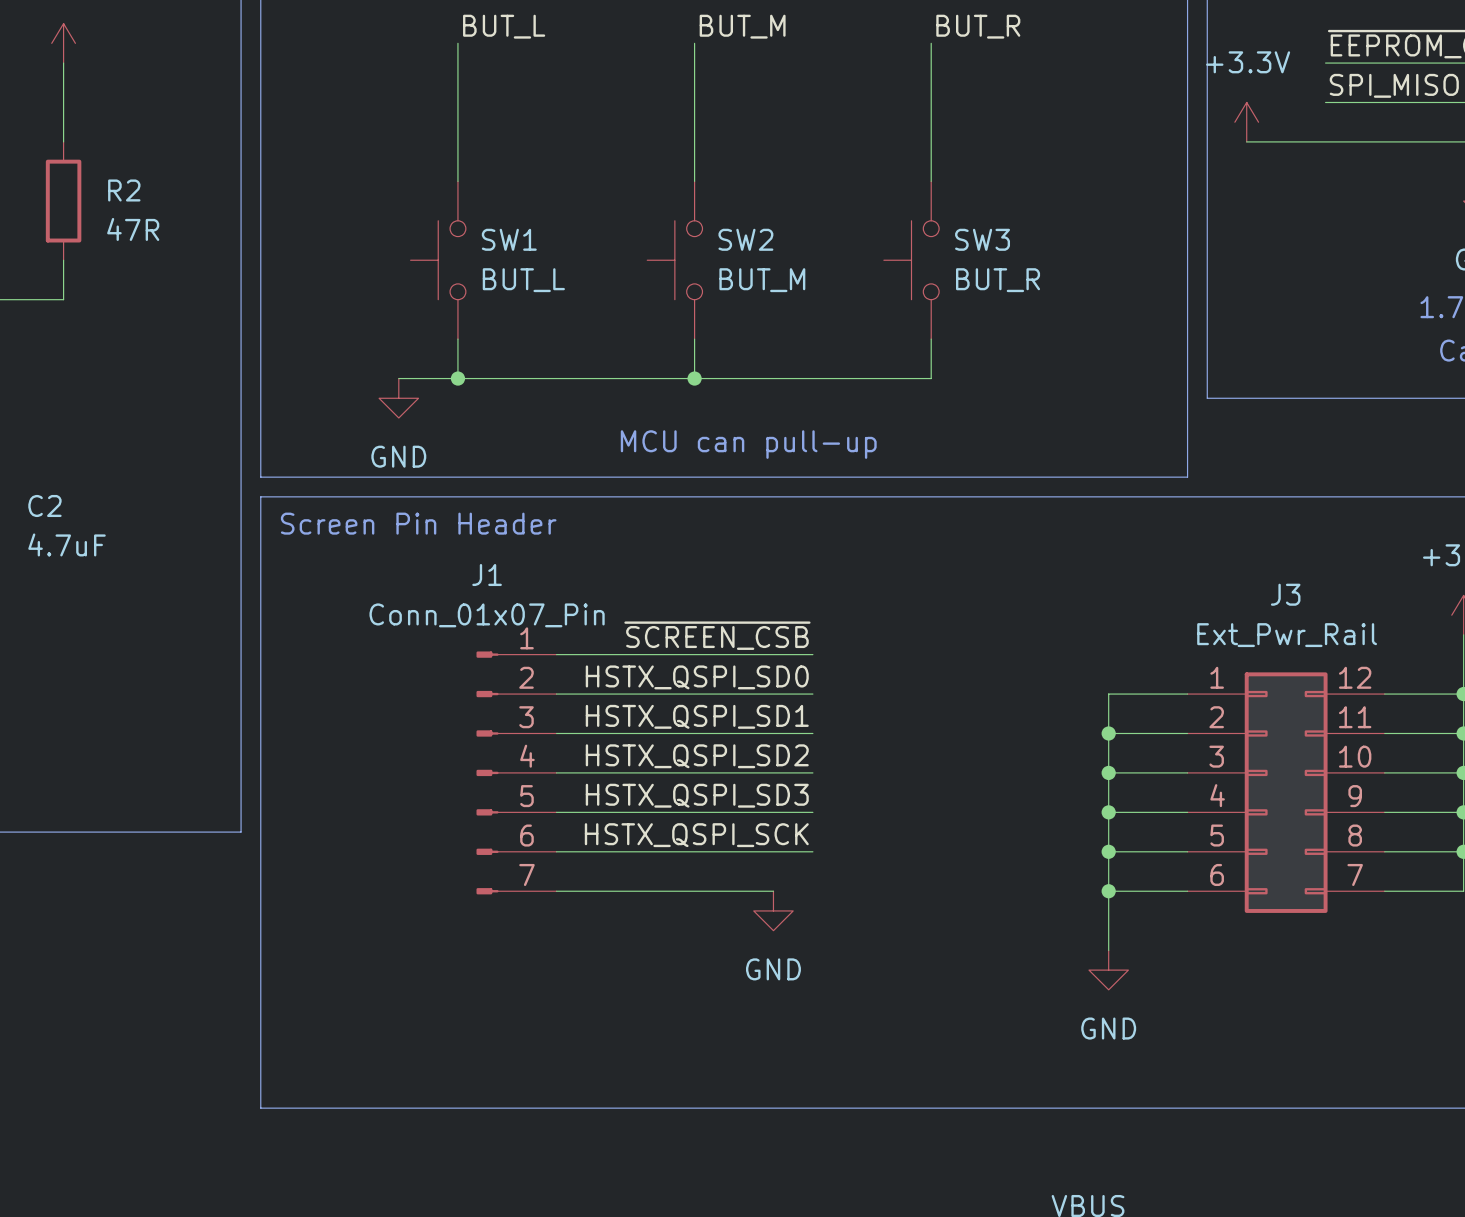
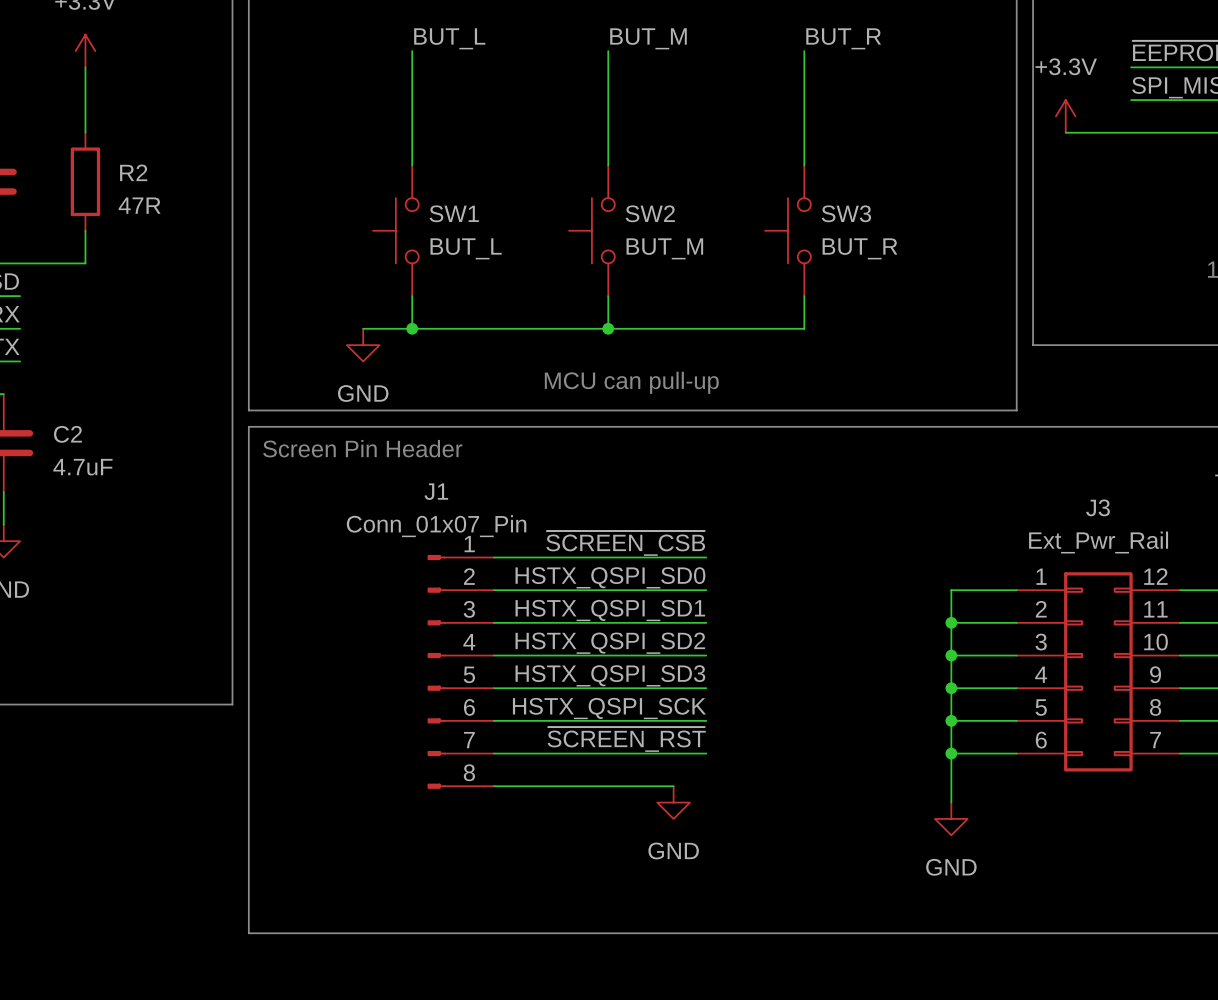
J1 symbol: [476, 651, 557, 895] -> [427, 554, 494, 789]
label: none -> ~{SCREEN_RST} (626, 739)
wire: none -> (673, 753) (706, 753)
power symbol position: GND (773, 910) -> GND (673, 802)
wire: none -> (493, 786) (673, 786)

